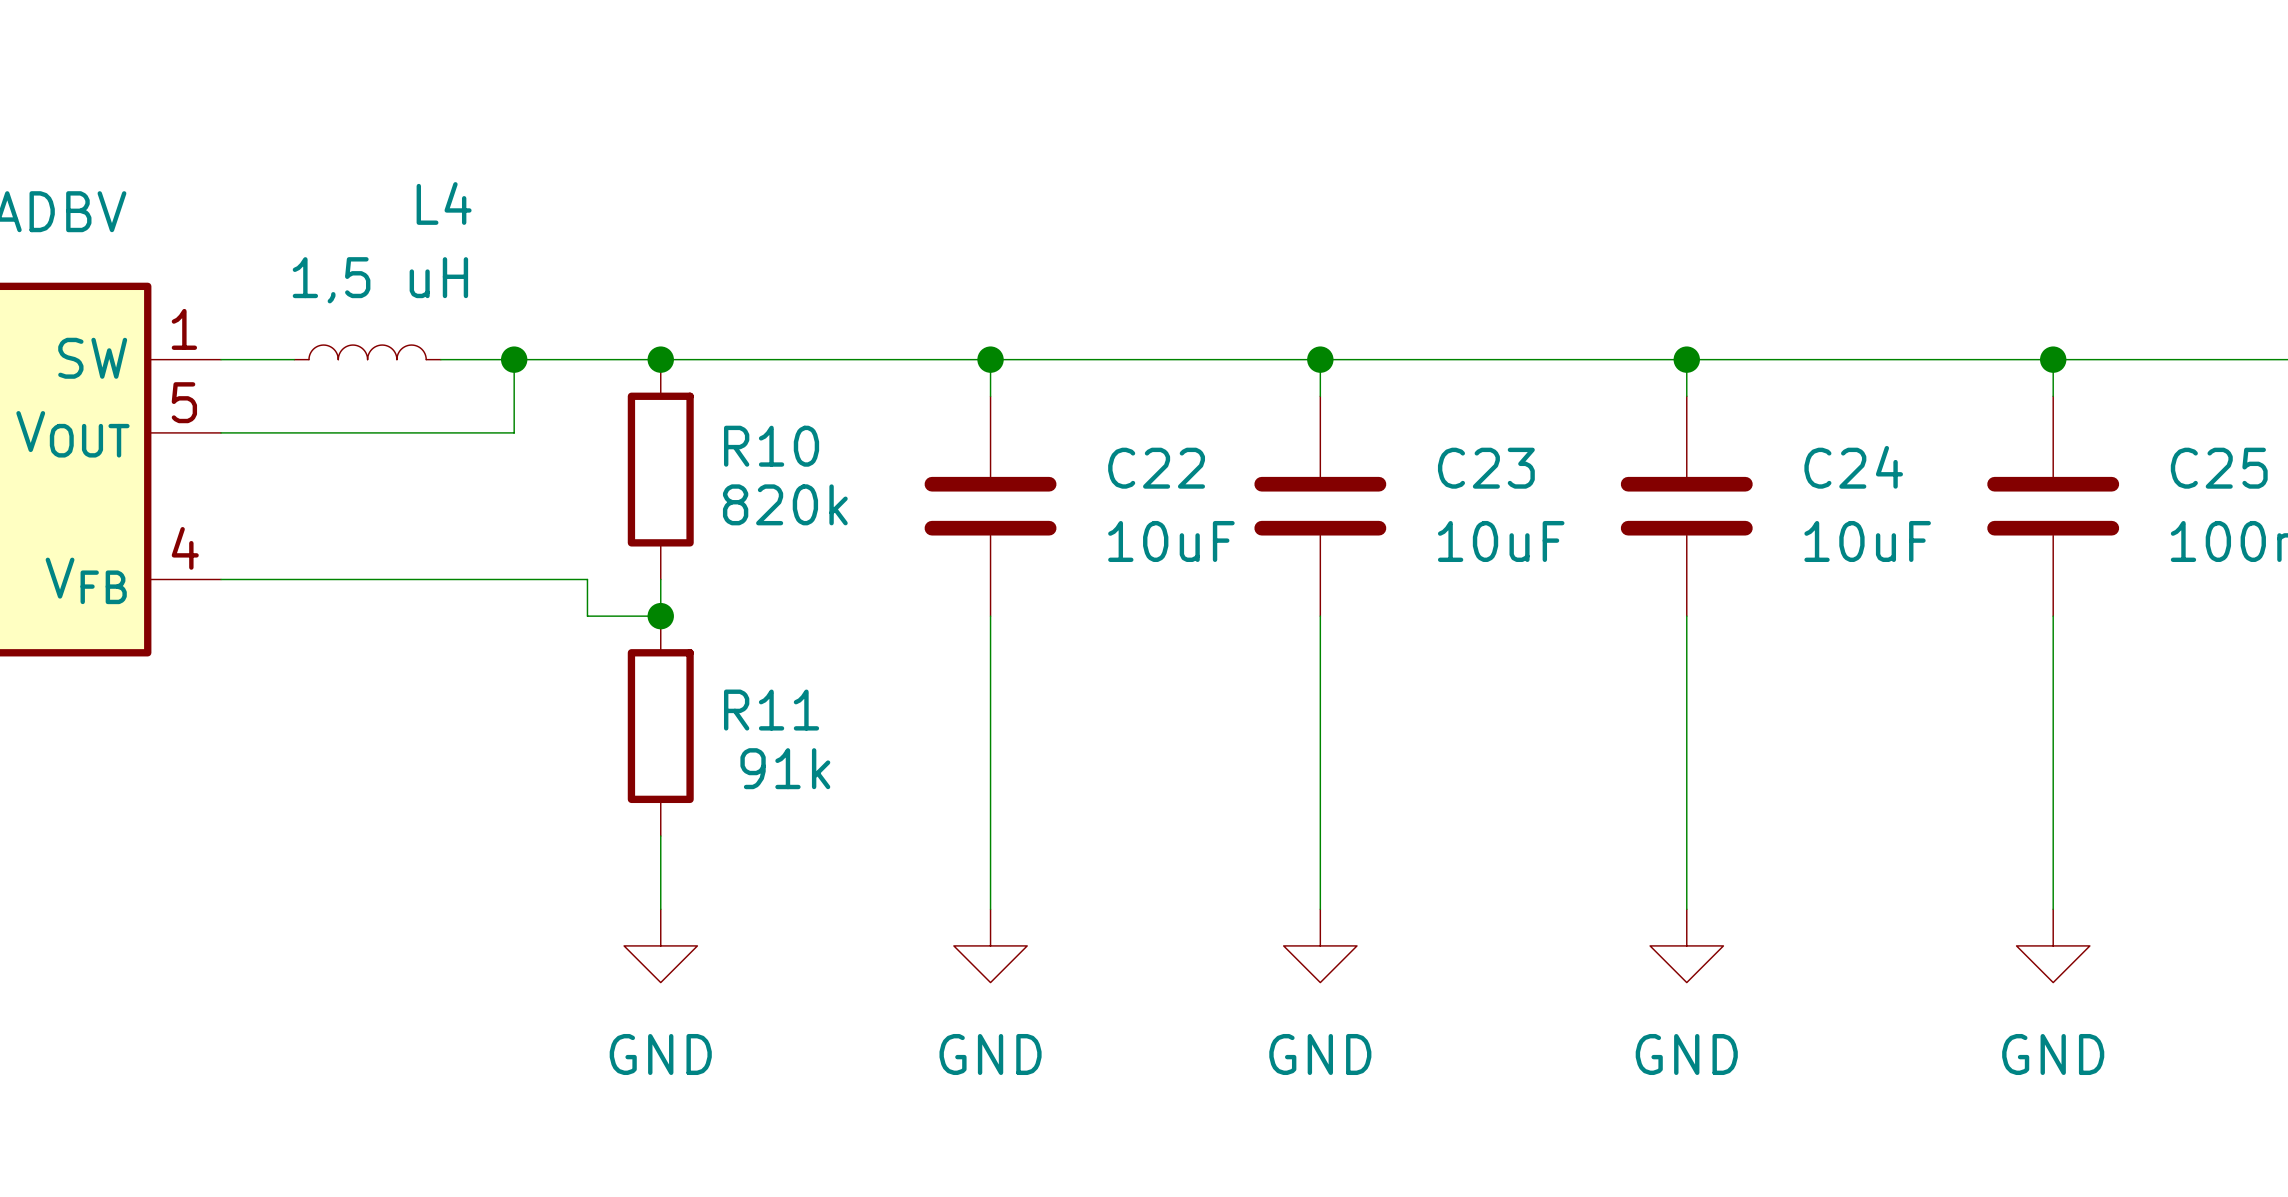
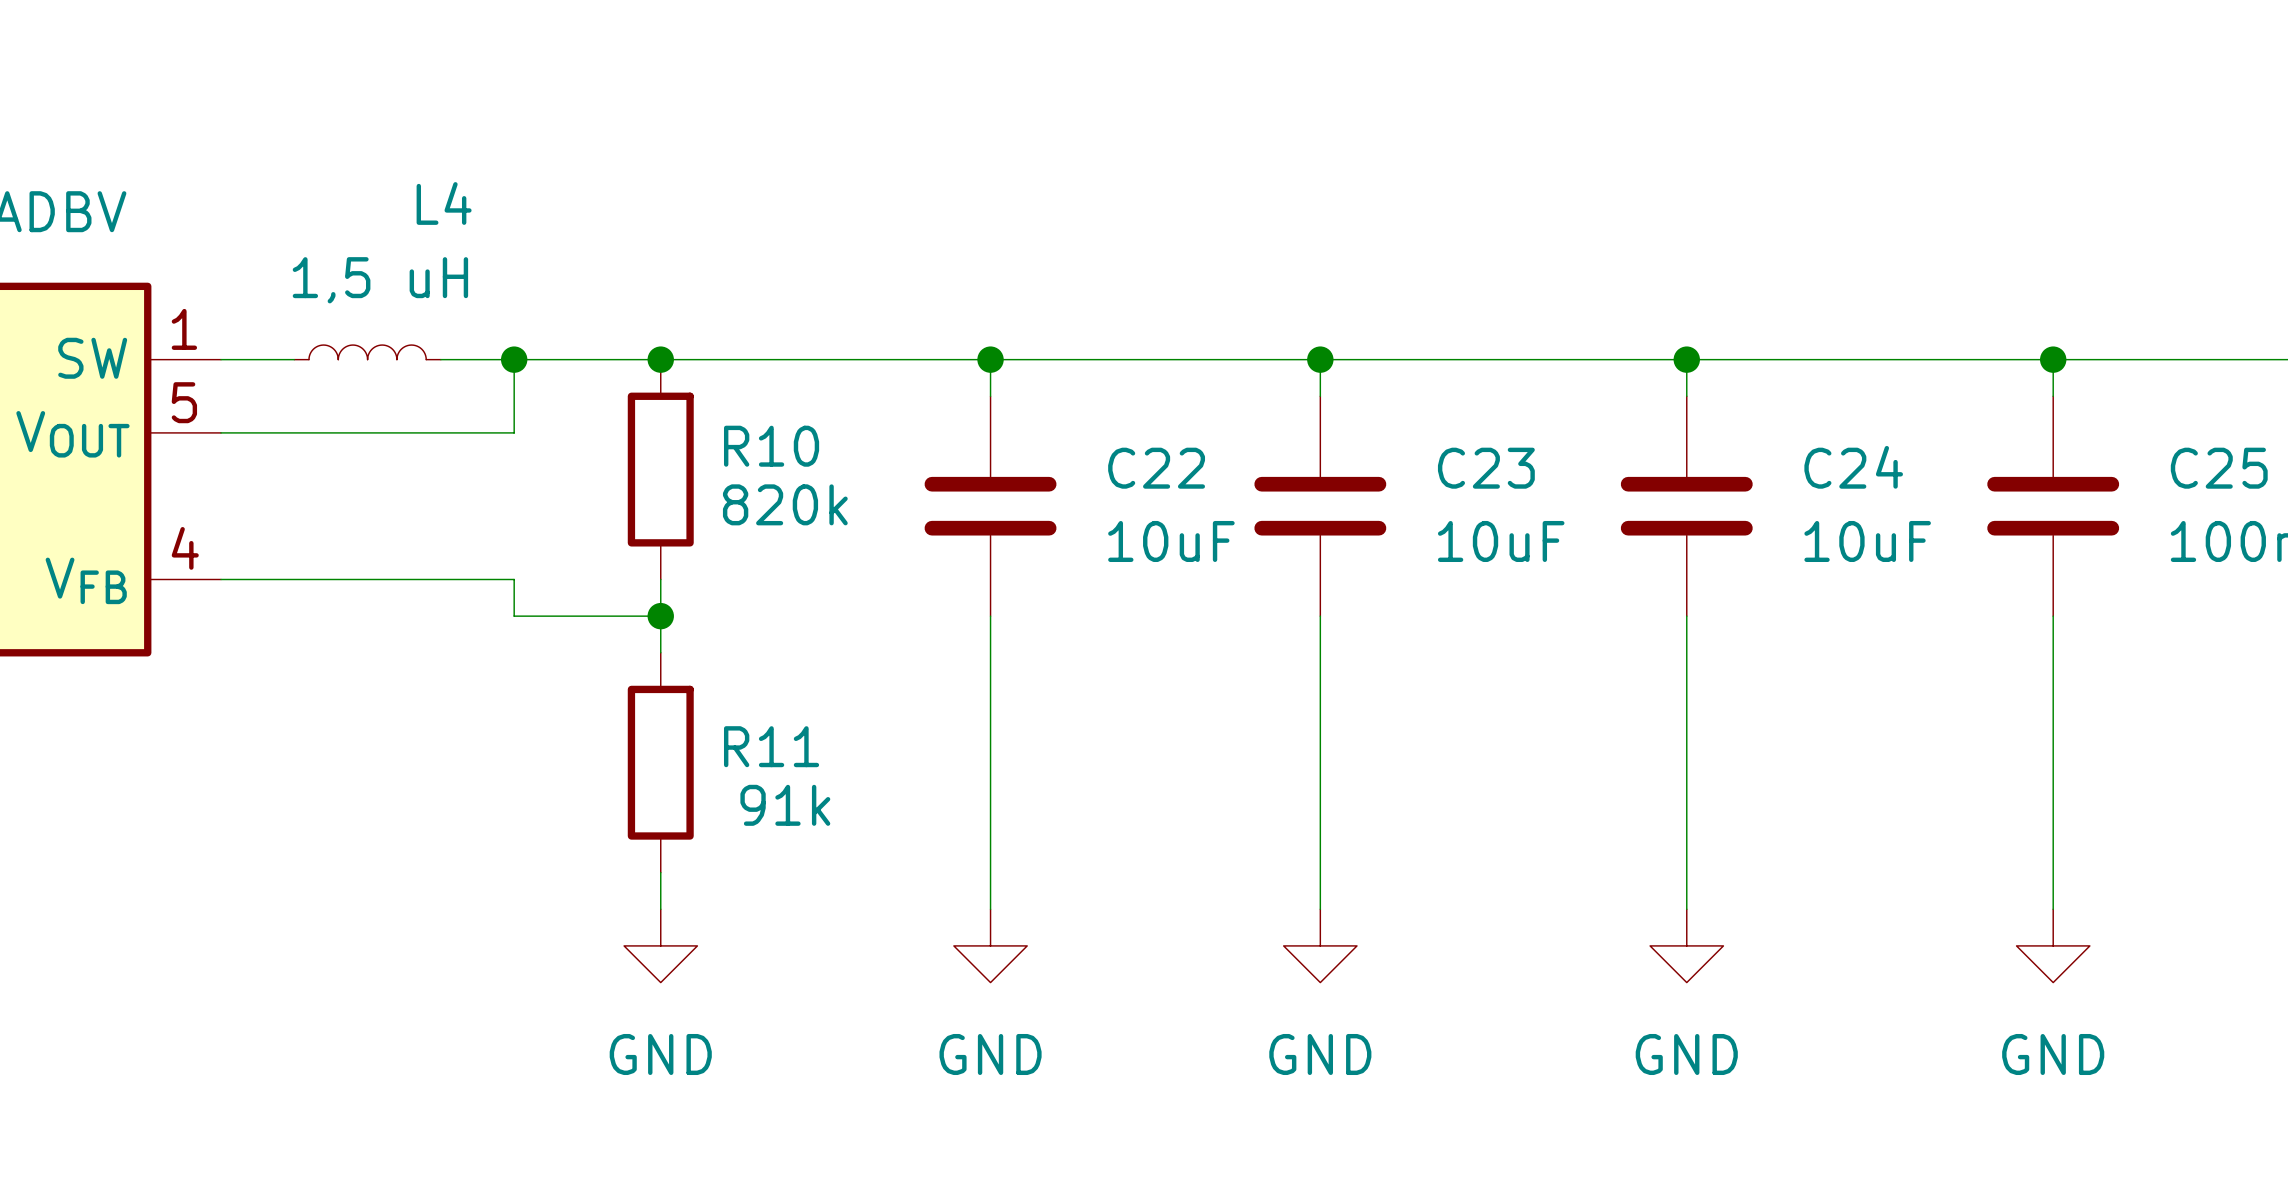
wire: (514, 579) (587, 579) (587, 616) -> (514, 579) (514, 616) (587, 616)
R11 position: (660, 726) -> (660, 762)

